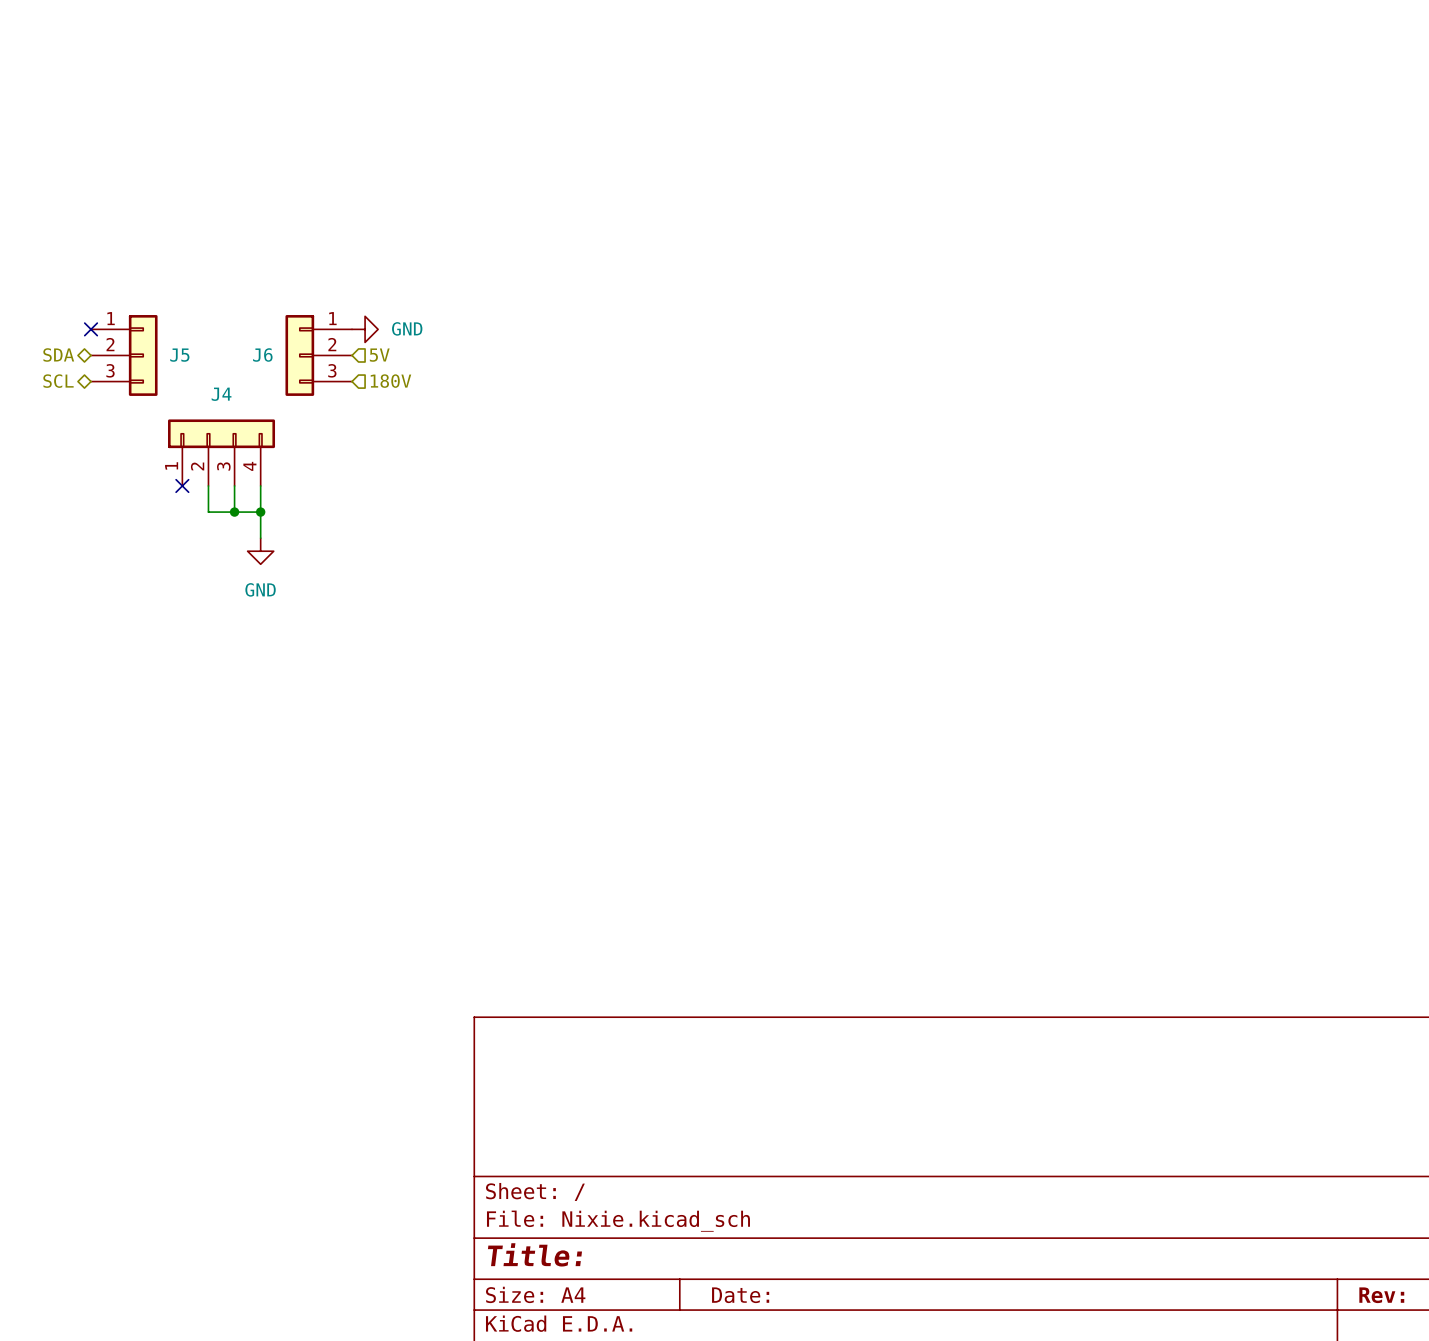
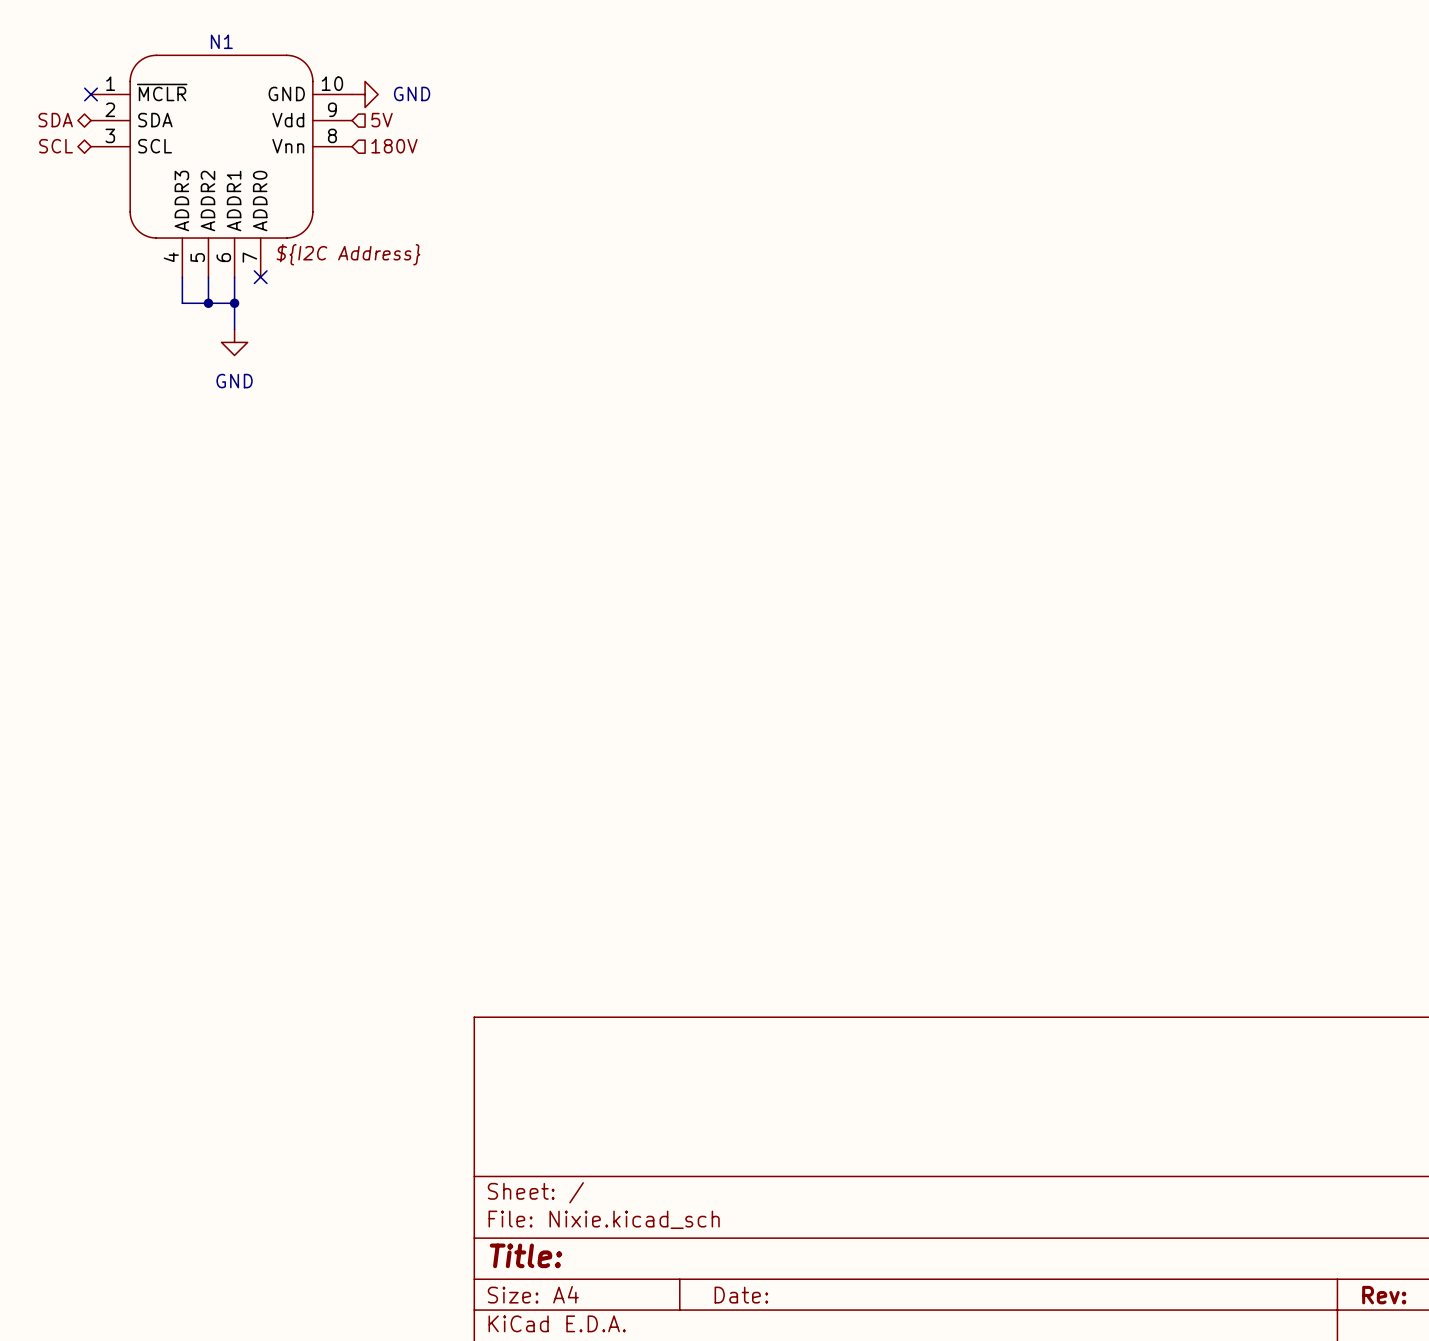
no-connect mark: none -> (91, 94)
power symbol: none -> GND (365, 94)
N1: none -> (221, 166)
no-connect mark: none -> (260, 277)
junction: none -> (208, 303)
junction: none -> (234, 303)
no-connect mark: (91, 329) -> none
power symbol: GND (365, 329) -> none
power symbol: none -> GND (234, 342)
hierarchical label position: SDA (58, 354) -> SDA (55, 120)
J5: (124, 355) -> none
J6: (318, 355) -> none
hierarchical label position: 5V (379, 355) -> 5V (382, 120)
hierarchical label position: SCL (58, 381) -> SCL (56, 146)
hierarchical label position: 180V (390, 381) -> 180V (394, 146)
J4: (221, 452) -> none
no-connect mark: (182, 485) -> none
wire: (208, 485) (208, 512) (260, 512) -> (182, 277) (182, 303) (234, 303)
wire: (234, 485) (234, 512) -> (208, 277) (208, 303)
wire: (260, 485) (260, 538) -> (234, 277) (234, 329)
junction: (234, 512) -> none
junction: (260, 512) -> none
power symbol: GND (260, 551) -> none

